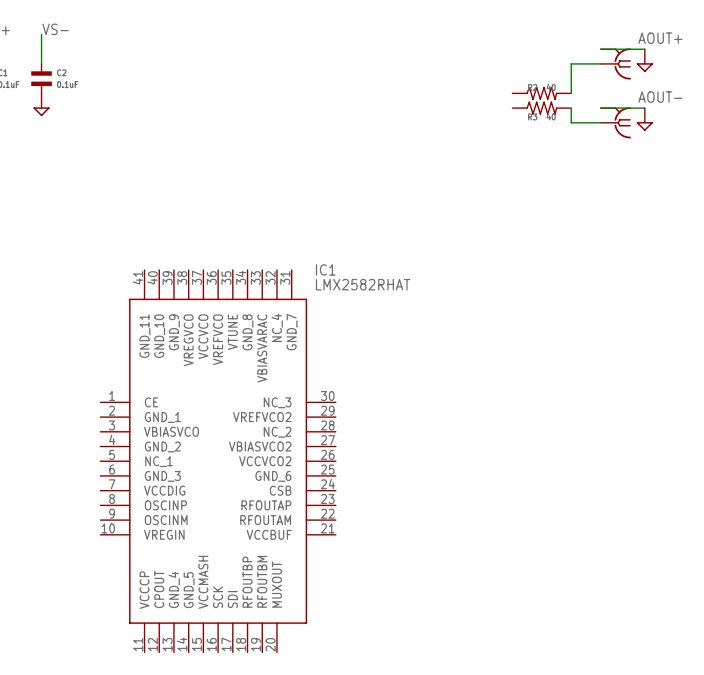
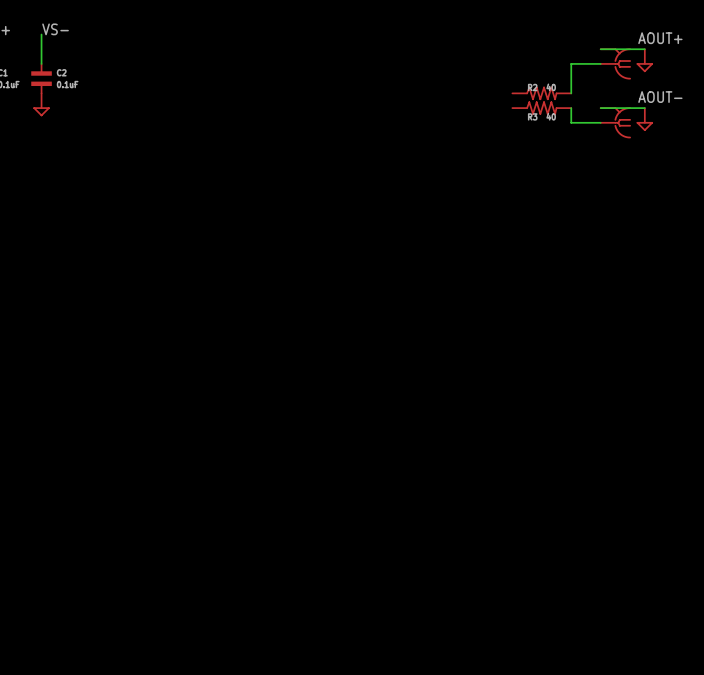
IC1: LMX2582RHAT (218, 461) -> none

